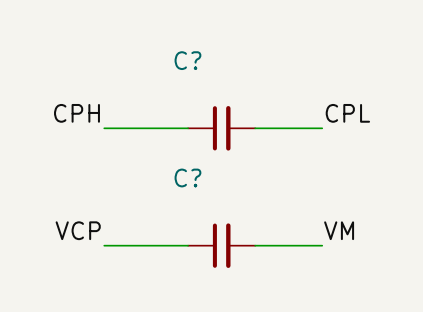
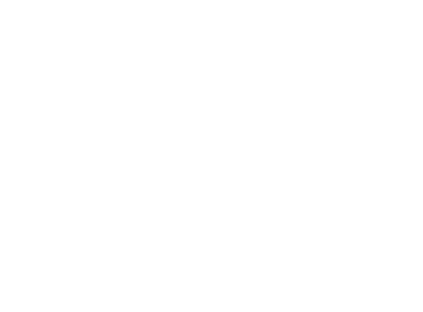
label: CPH (76, 113) -> none
label: CPL (347, 113) -> none
wire: (104, 128) (188, 128) -> none
C?: (221, 128) -> none
wire: (255, 128) (322, 128) -> none
label: VCP (78, 230) -> none
label: VM (339, 230) -> none
wire: (104, 245) (188, 245) -> none
C?: (221, 245) -> none
wire: (255, 245) (322, 245) -> none

